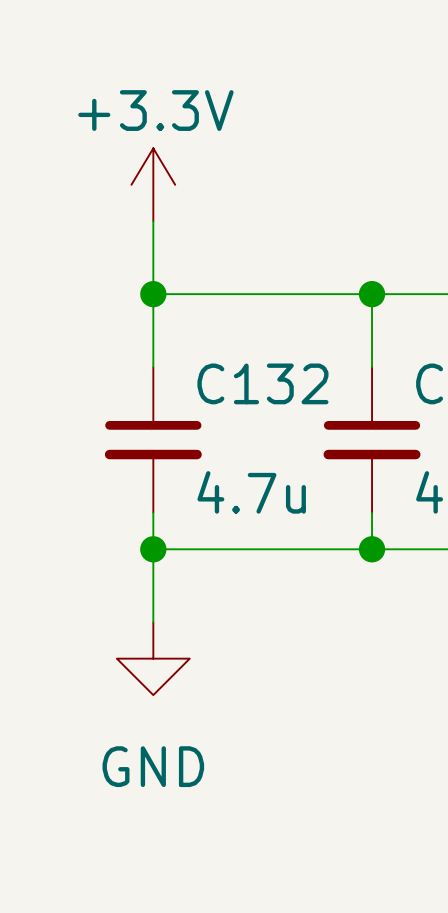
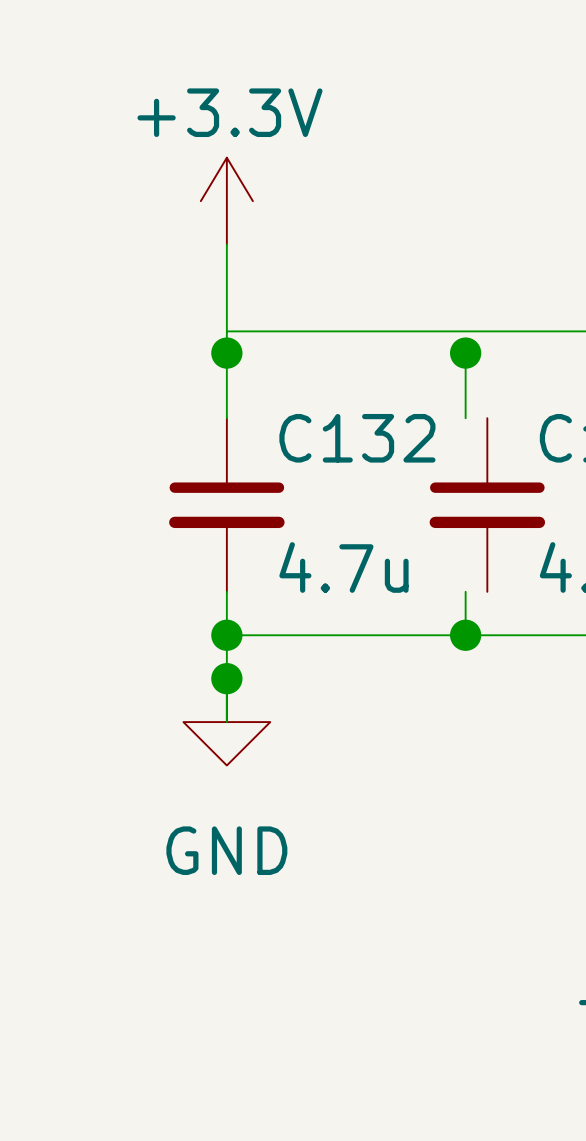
junction position: (153, 294) -> (226, 353)
wire: (372, 294) (372, 367) -> none
junction position: (372, 294) -> (465, 353)
wire: none -> (465, 353) (465, 418)
wire: (372, 512) (372, 549) -> (465, 591) (465, 635)
junction position: (372, 549) -> (465, 635)
junction: none -> (226, 678)
power symbol position: GND (153, 658) -> GND (226, 722)

